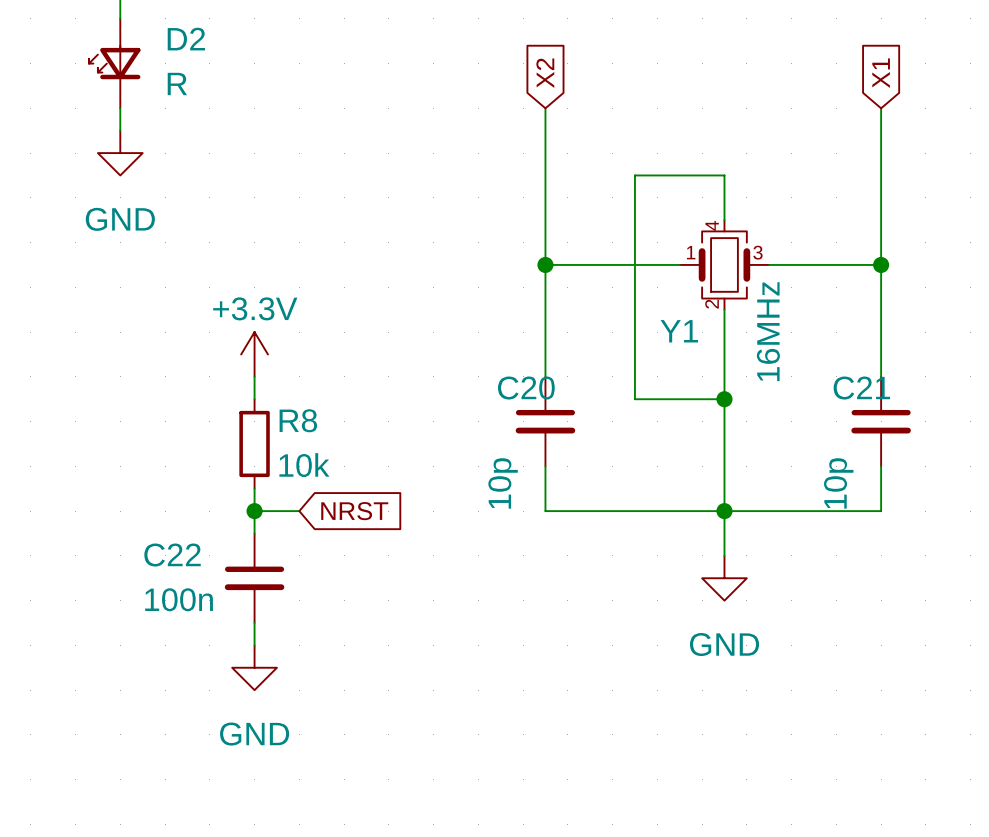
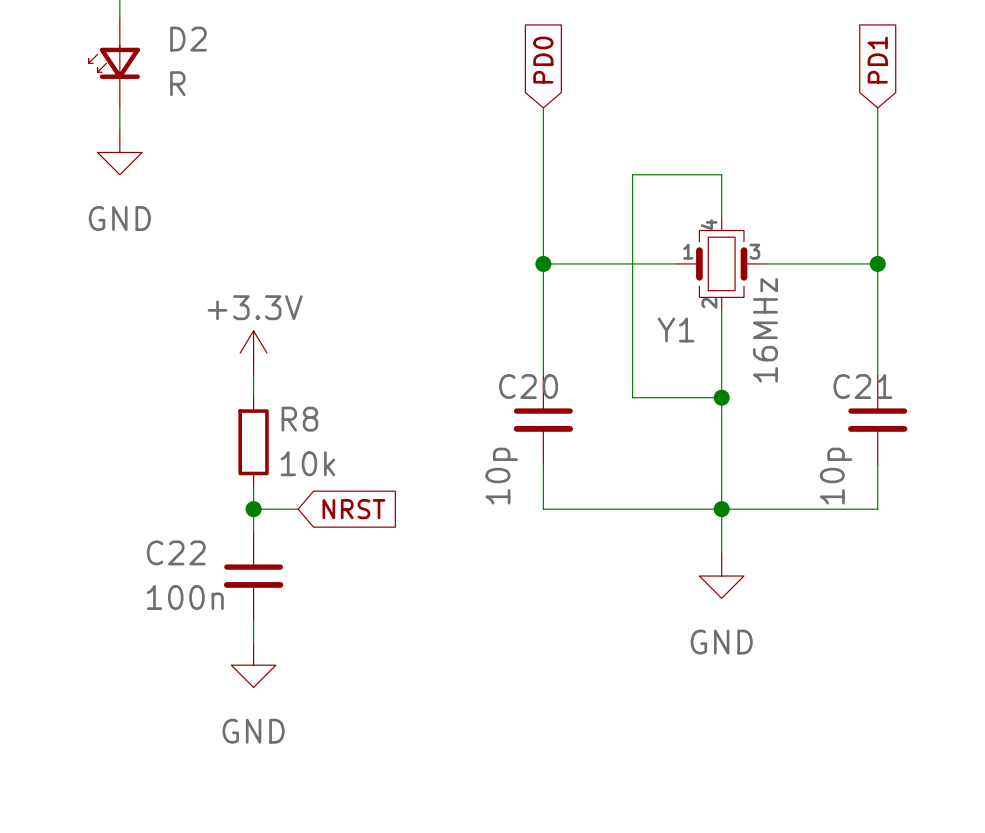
global label: X2 (545, 73) -> PD0 (543, 60)
global label: X1 (881, 73) -> PD1 (877, 60)

